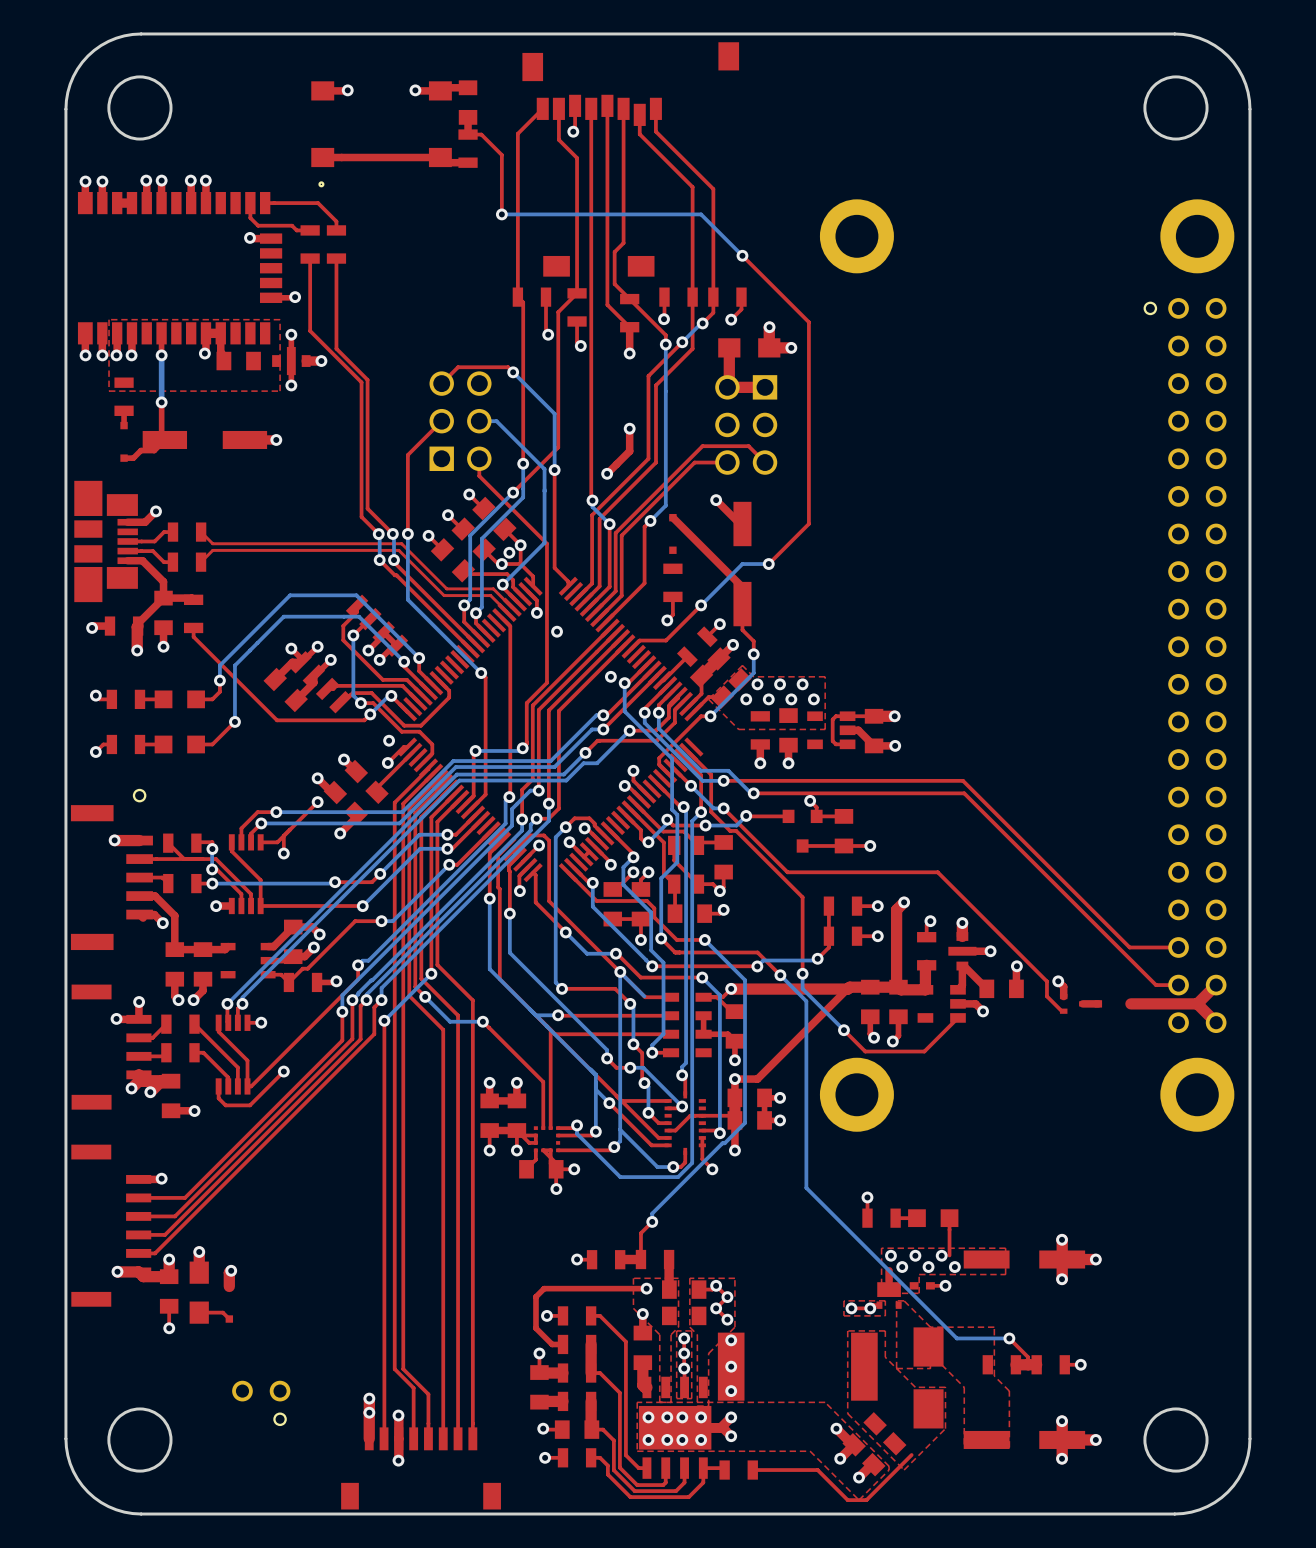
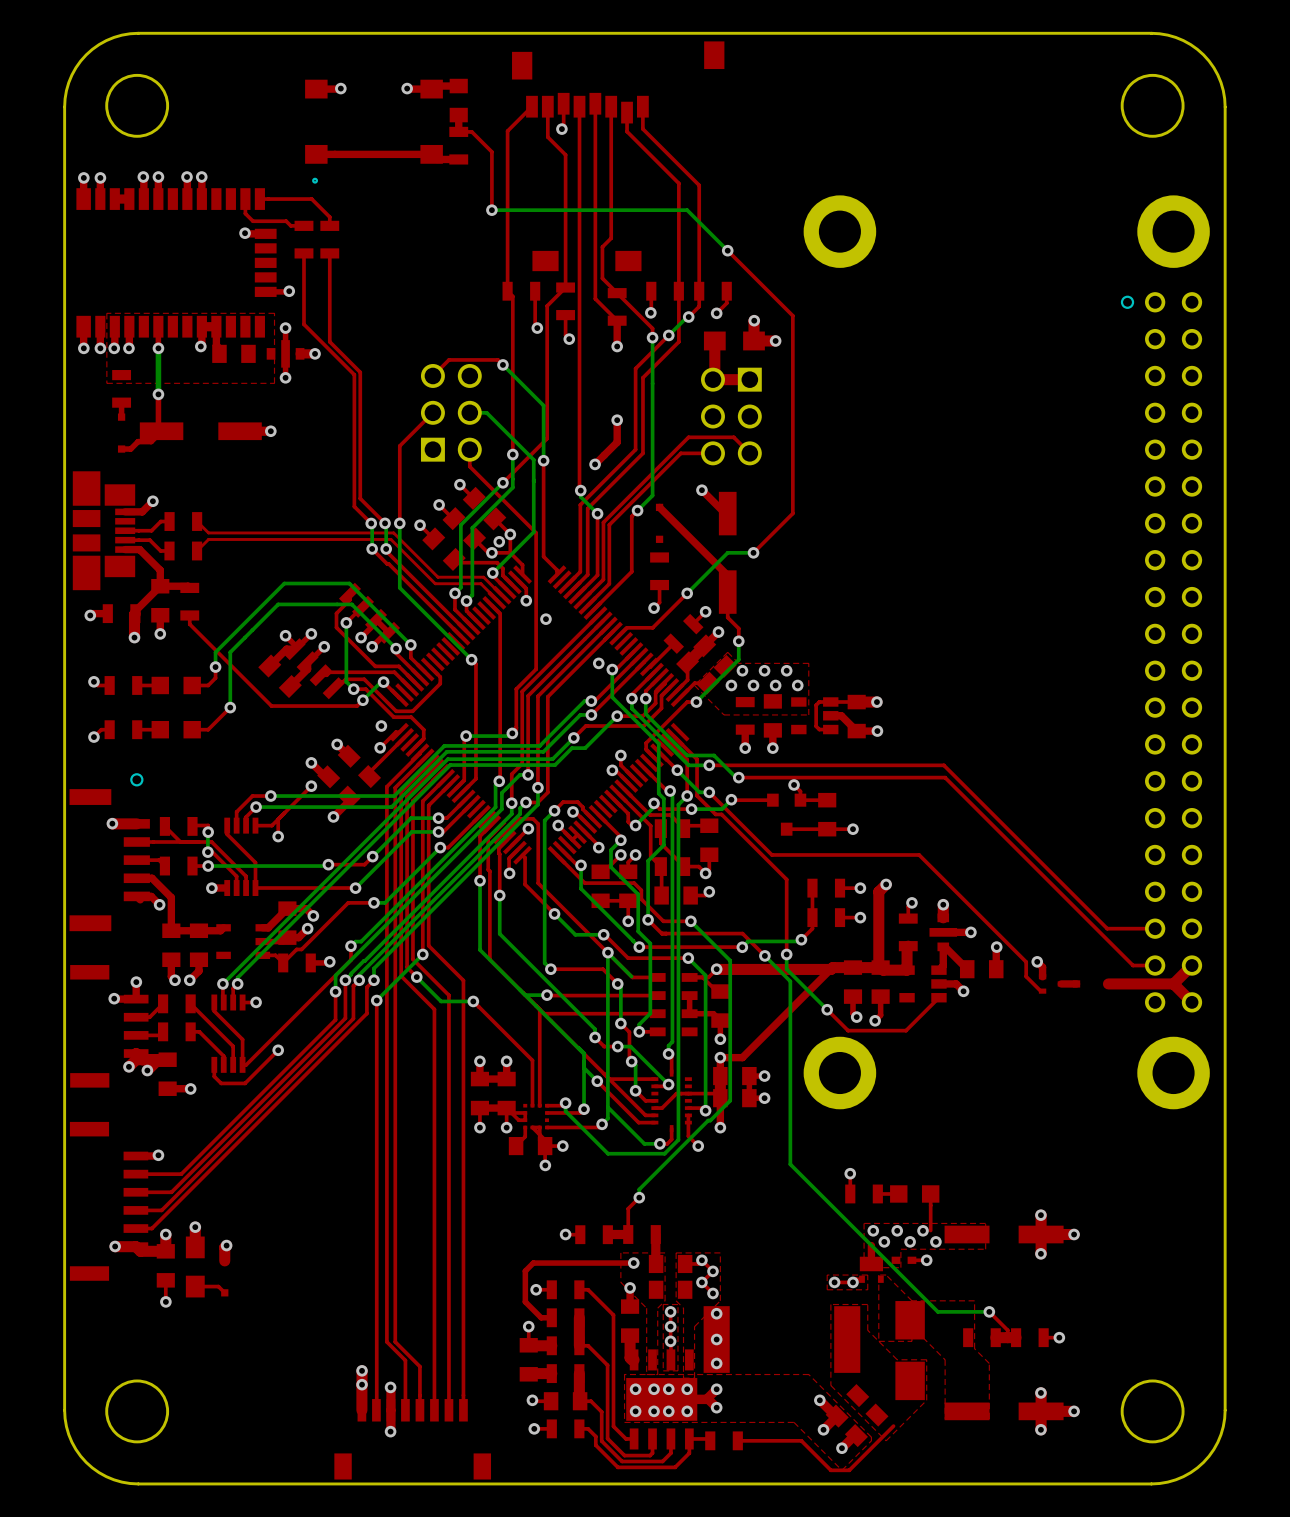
part: (261, 1403) -> none

